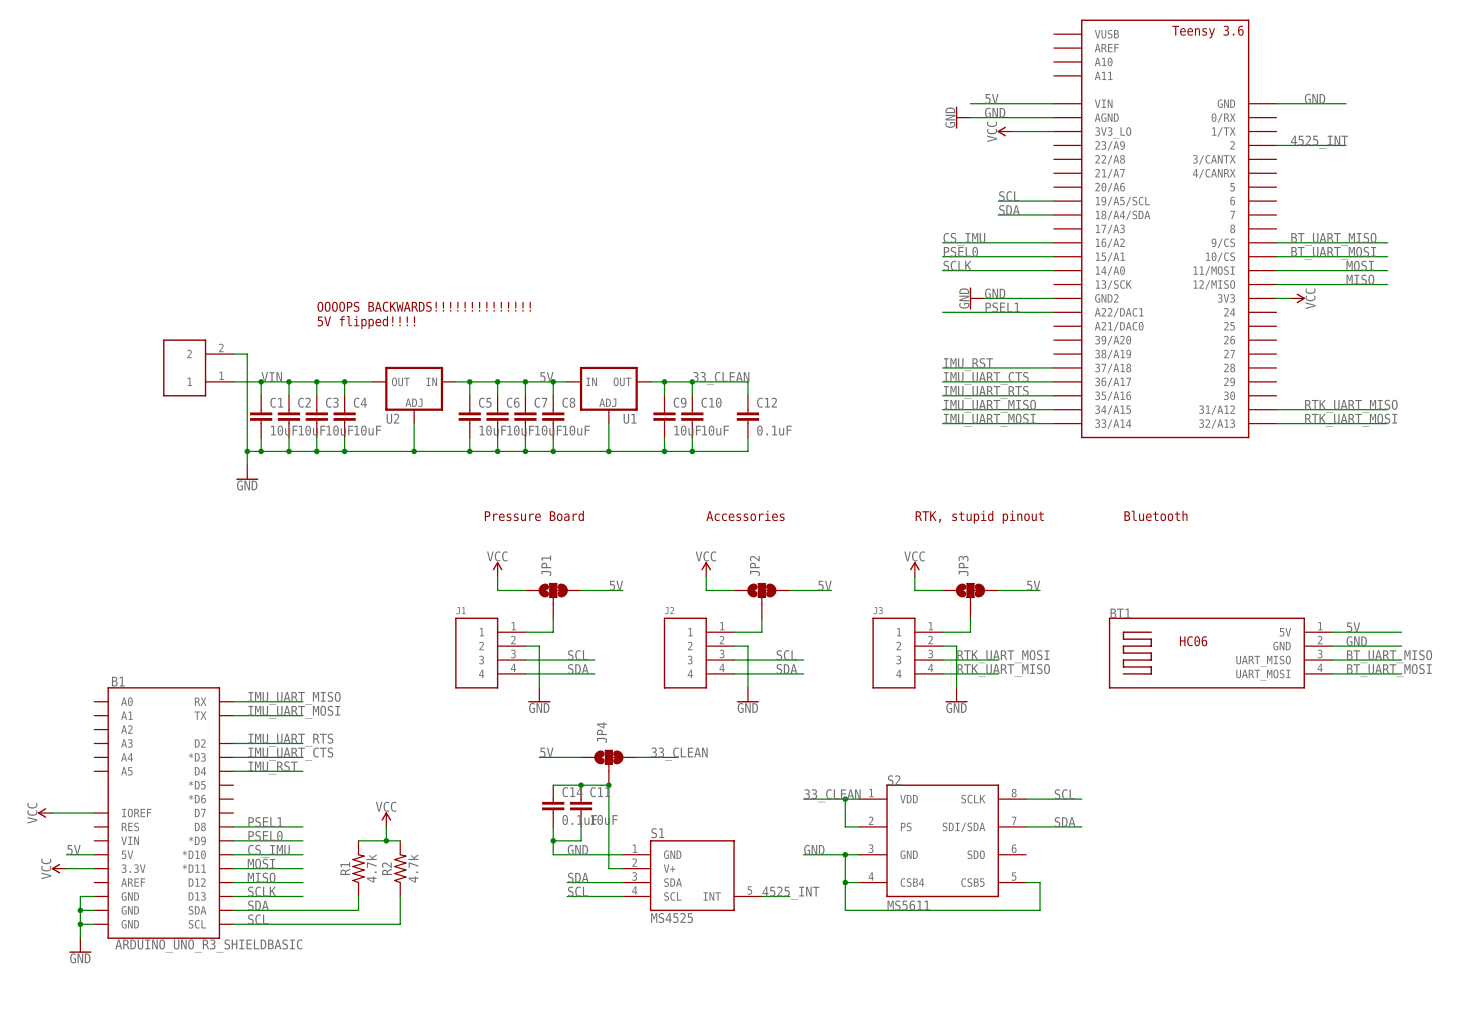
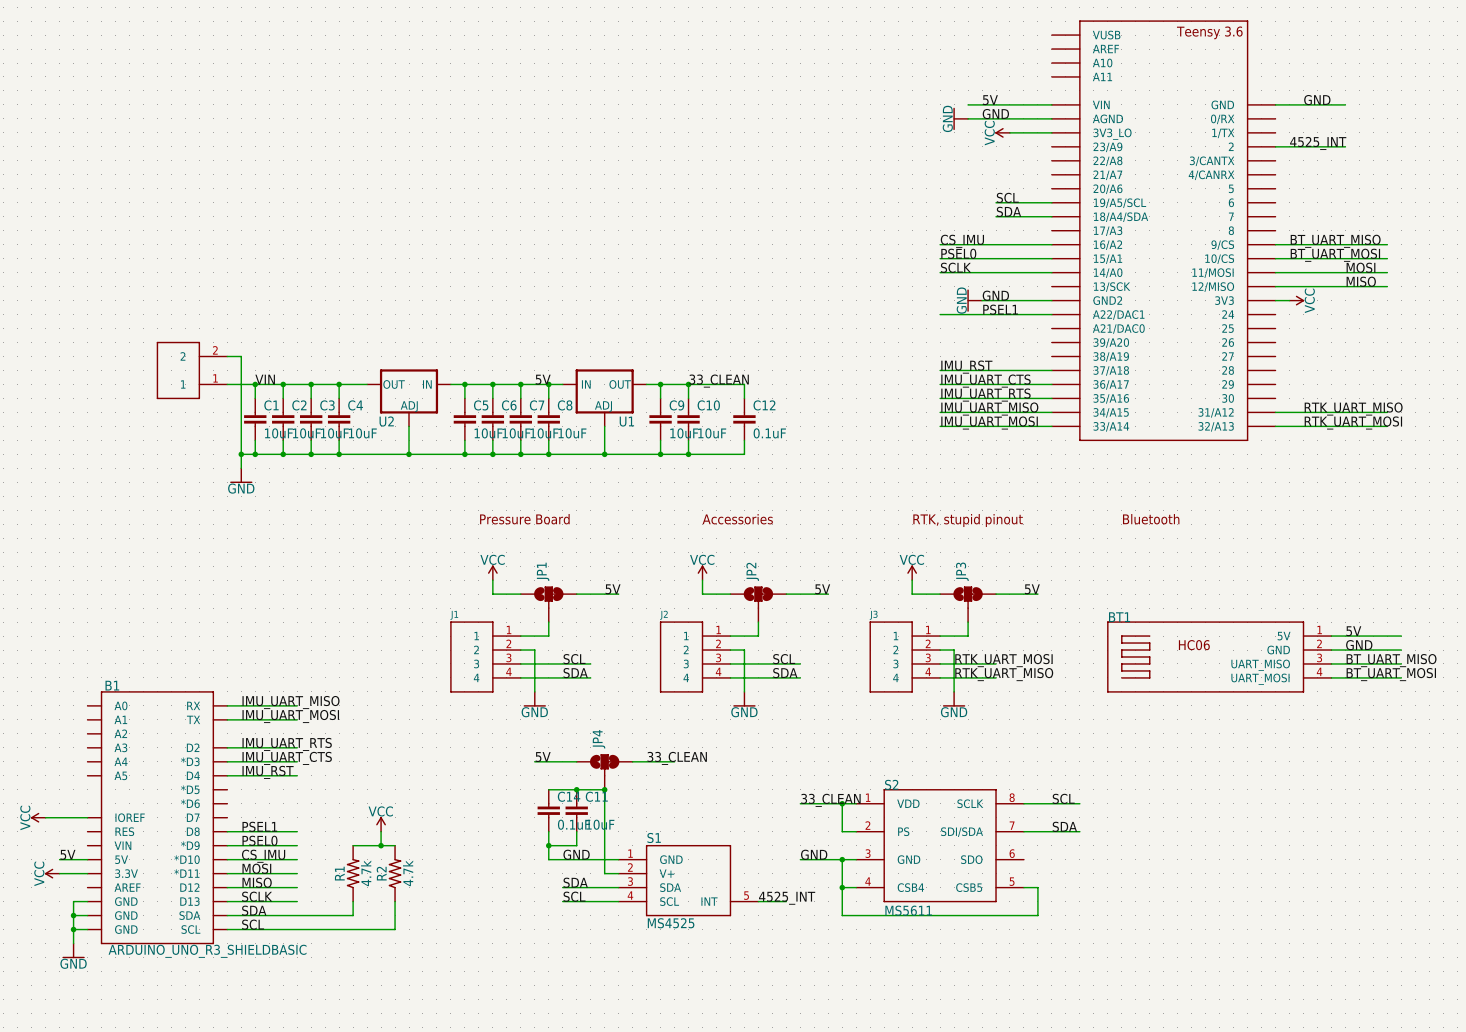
text: OOOOPS BACKWARDS!!!!!!!!!!!!!! (424, 306) -> none
text: 5V flipped!!!! (366, 322) -> none

